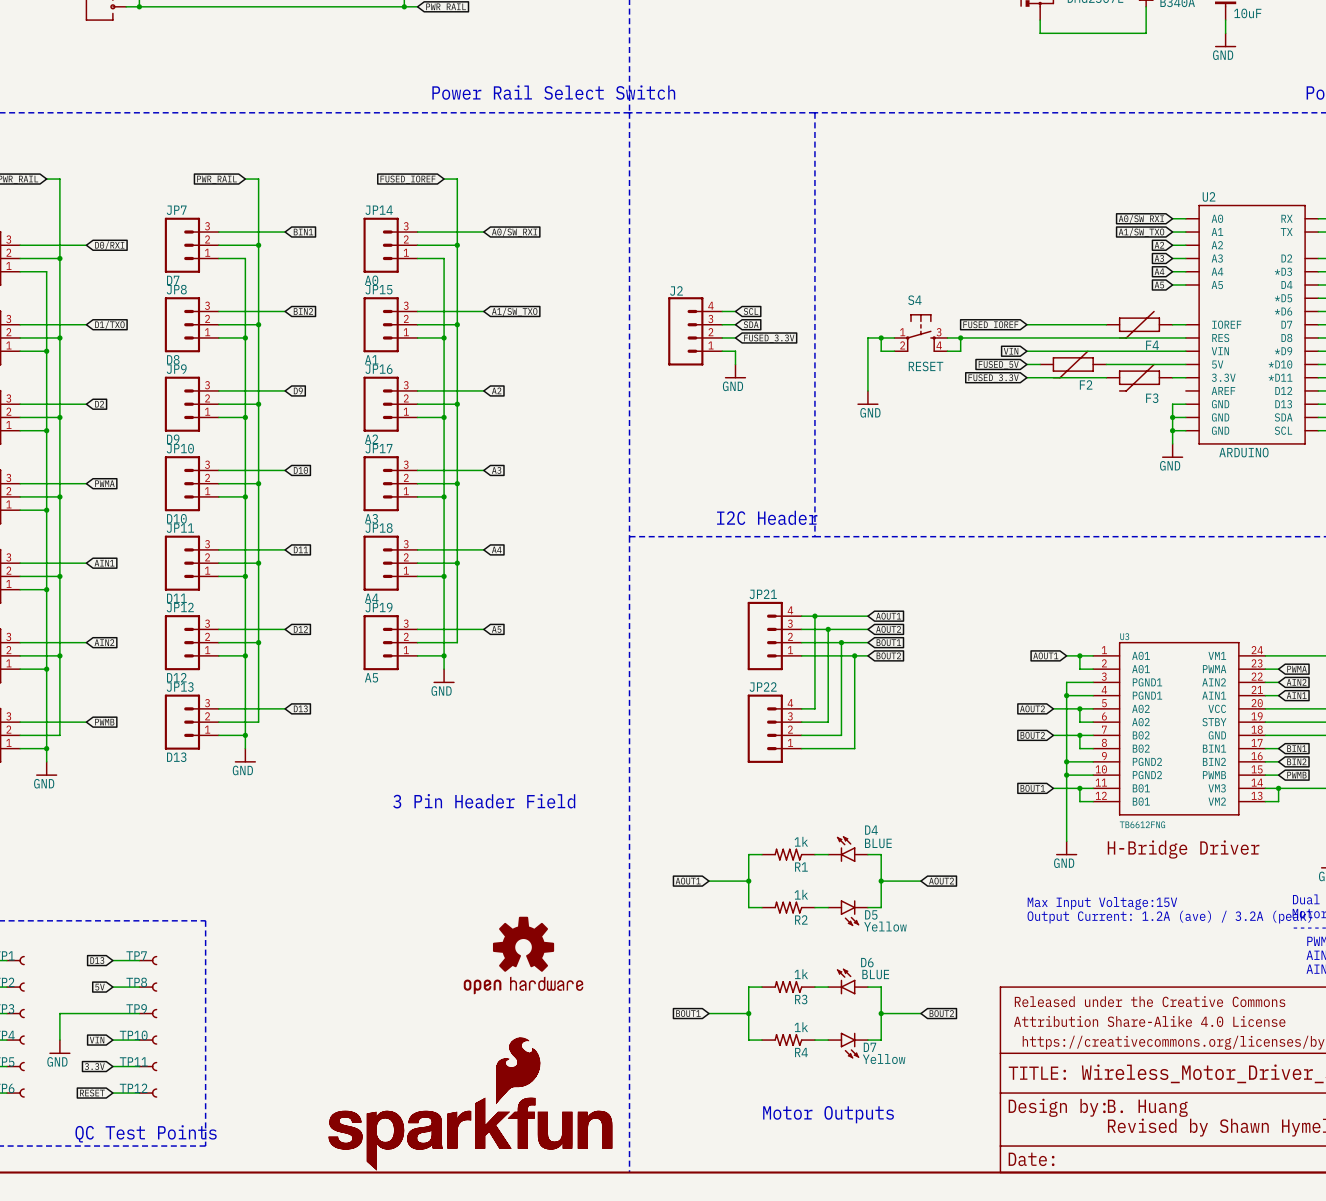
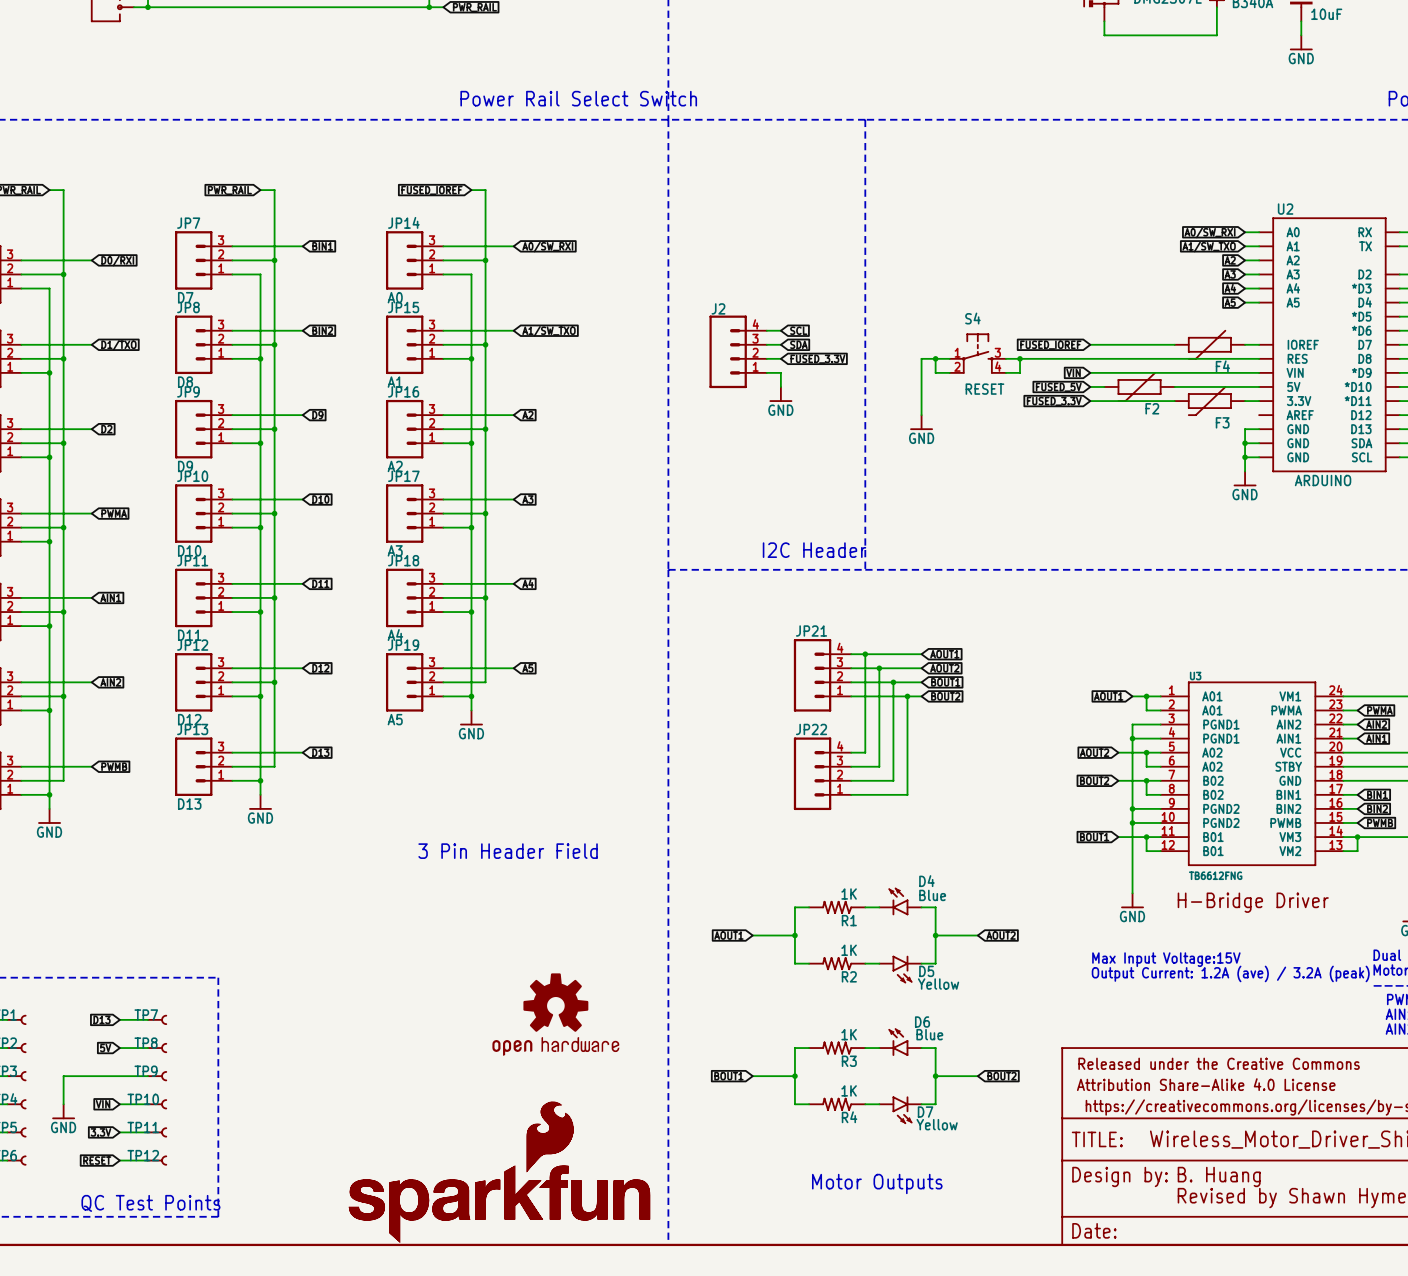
R1 value: 1k (801, 841) -> 1K (849, 894)
D4 value: BLUE (878, 843) -> Blue (932, 895)
R2 value: 1k (801, 894) -> 1K (849, 950)
R3 value: 1k (801, 974) -> 1K (849, 1034)
D6 value: BLUE (875, 974) -> Blue (929, 1034)
R4 value: 1k (801, 1027) -> 1K (849, 1090)

